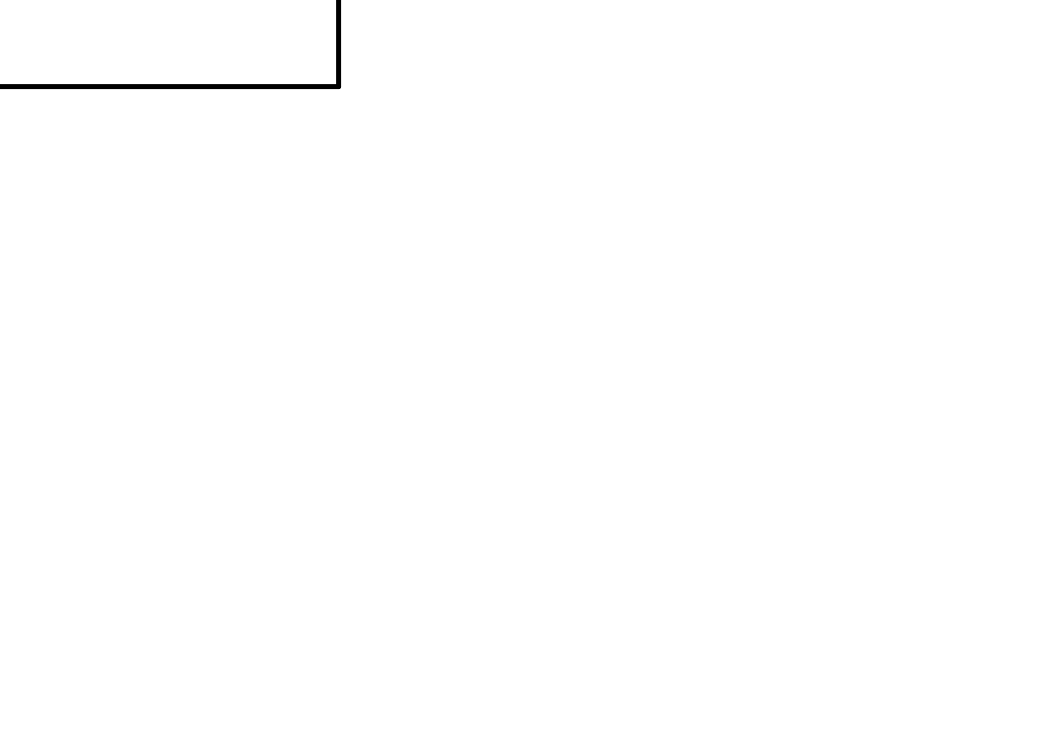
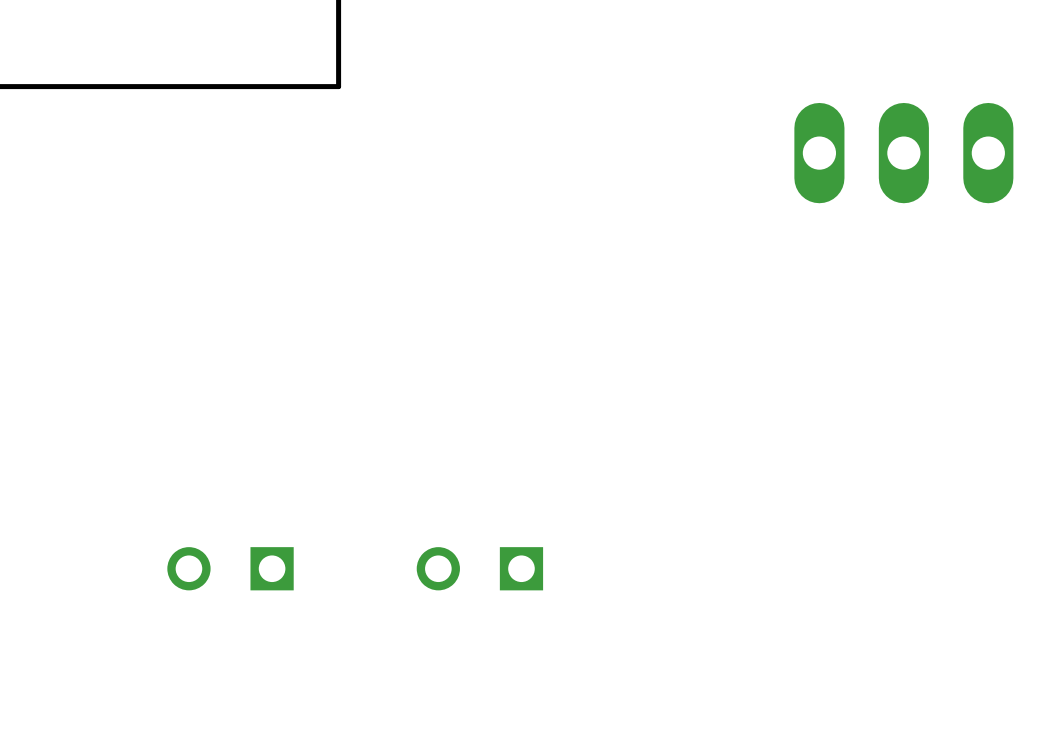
part: none -> (903, 153)
part: none -> (230, 568)
part: none -> (479, 568)

